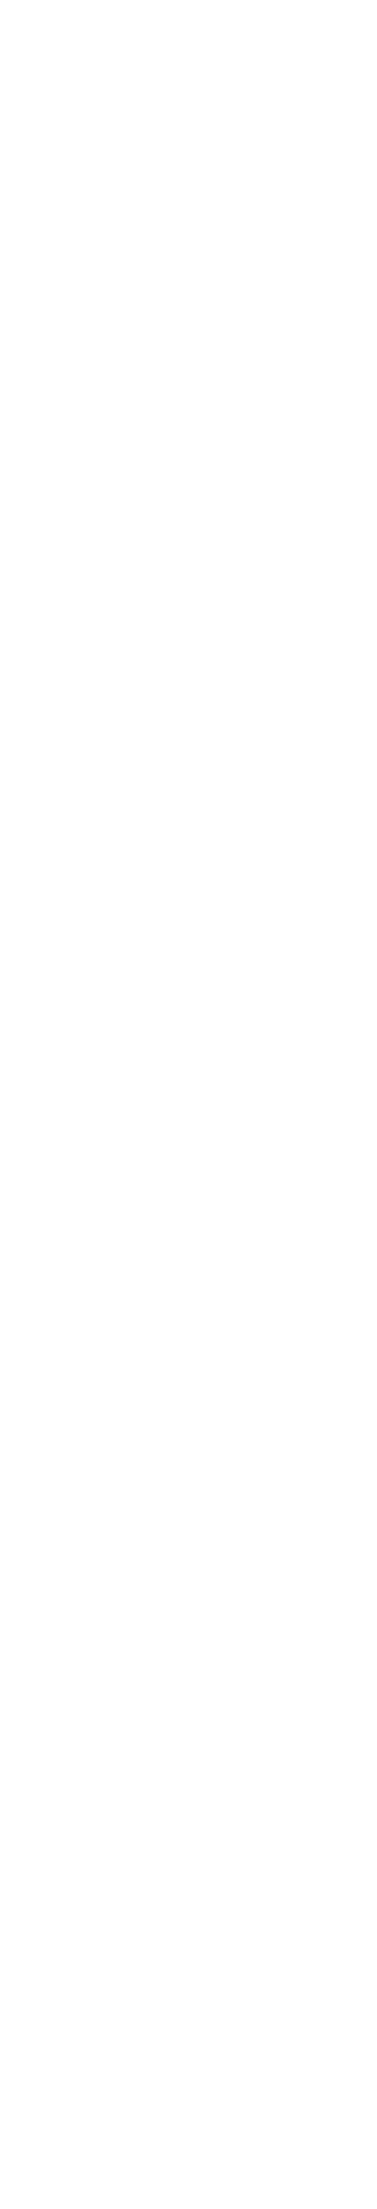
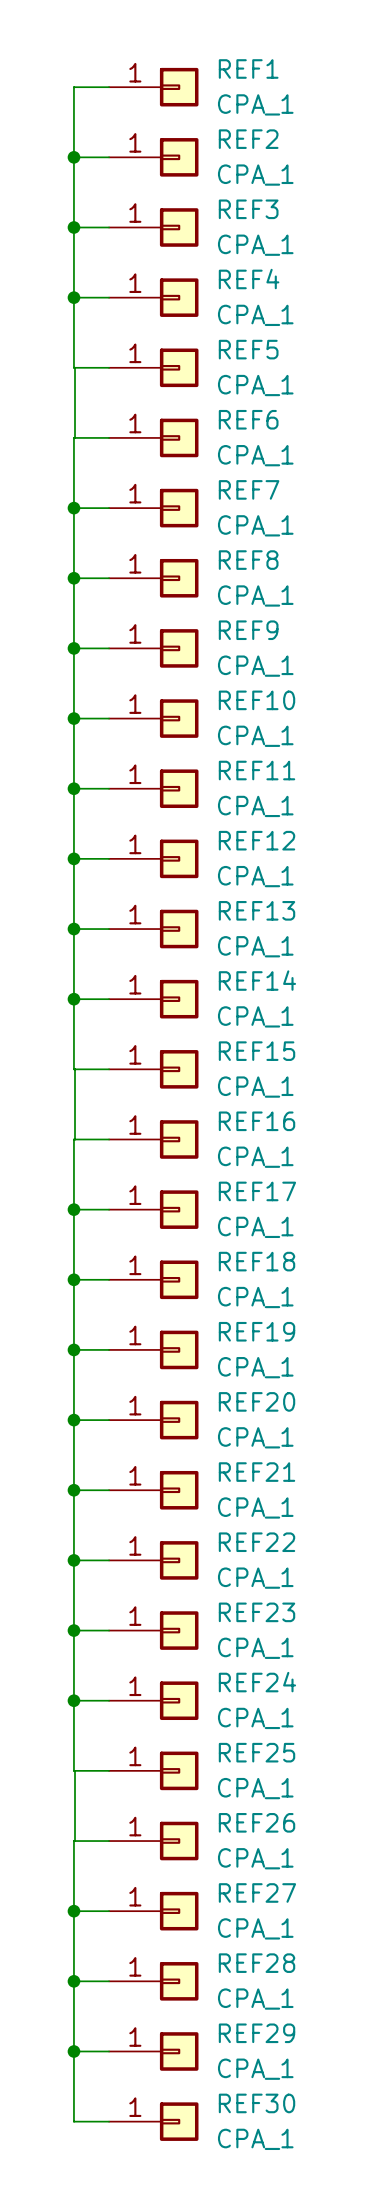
wire: none -> (109, 87) (73, 87) (73, 367) (109, 367)
REF1: none -> CPA_1 (153, 87)
wire: none -> (73, 157) (109, 157)
junction: none -> (73, 157)
REF2: none -> CPA_1 (153, 157)
wire: none -> (73, 227) (109, 227)
junction: none -> (73, 227)
REF3: none -> CPA_1 (153, 227)
wire: none -> (73, 297) (109, 297)
junction: none -> (73, 297)
REF4: none -> CPA_1 (153, 297)
wire: none -> (75, 367) (75, 437)
REF5: none -> CPA_1 (153, 367)
wire: none -> (109, 437) (73, 437) (73, 1069) (109, 1069)
REF6: none -> CPA_1 (153, 437)
wire: none -> (73, 508) (109, 508)
junction: none -> (73, 508)
REF7: none -> CPA_1 (153, 508)
wire: none -> (73, 578) (109, 578)
junction: none -> (73, 578)
REF8: none -> CPA_1 (153, 578)
wire: none -> (73, 648) (109, 648)
junction: none -> (73, 648)
REF9: none -> CPA_1 (153, 648)
wire: none -> (73, 718) (109, 718)
junction: none -> (73, 718)
REF10: none -> CPA_1 (153, 718)
wire: none -> (73, 788) (109, 788)
junction: none -> (73, 788)
REF11: none -> CPA_1 (153, 788)
wire: none -> (73, 858) (109, 858)
junction: none -> (73, 858)
REF12: none -> CPA_1 (153, 858)
wire: none -> (73, 929) (109, 929)
junction: none -> (73, 929)
REF13: none -> CPA_1 (153, 929)
wire: none -> (73, 999) (109, 999)
junction: none -> (73, 999)
REF14: none -> CPA_1 (153, 999)
wire: none -> (75, 1069) (75, 1139)
REF15: none -> CPA_1 (153, 1069)
wire: none -> (109, 1139) (73, 1139) (73, 1770) (109, 1770)
REF16: none -> CPA_1 (153, 1139)
wire: none -> (73, 1209) (109, 1209)
junction: none -> (73, 1209)
REF17: none -> CPA_1 (153, 1209)
wire: none -> (73, 1279) (109, 1279)
junction: none -> (73, 1279)
REF18: none -> CPA_1 (153, 1279)
wire: none -> (73, 1349) (109, 1349)
junction: none -> (73, 1349)
REF19: none -> CPA_1 (153, 1349)
wire: none -> (73, 1420) (109, 1420)
junction: none -> (73, 1420)
REF20: none -> CPA_1 (153, 1420)
wire: none -> (73, 1490) (109, 1490)
junction: none -> (73, 1490)
REF21: none -> CPA_1 (153, 1490)
wire: none -> (73, 1560) (109, 1560)
junction: none -> (73, 1560)
REF22: none -> CPA_1 (153, 1560)
wire: none -> (73, 1630) (109, 1630)
junction: none -> (73, 1630)
REF23: none -> CPA_1 (153, 1630)
wire: none -> (73, 1700) (109, 1700)
junction: none -> (73, 1700)
REF24: none -> CPA_1 (153, 1700)
wire: none -> (75, 1770) (75, 1841)
REF25: none -> CPA_1 (153, 1770)
wire: none -> (109, 1841) (73, 1841) (73, 2121) (109, 2121)
REF26: none -> CPA_1 (153, 1841)
wire: none -> (73, 1911) (109, 1911)
junction: none -> (73, 1911)
REF27: none -> CPA_1 (153, 1911)
wire: none -> (73, 1981) (109, 1981)
junction: none -> (73, 1981)
REF28: none -> CPA_1 (153, 1981)
wire: none -> (73, 2051) (109, 2051)
junction: none -> (73, 2051)
REF29: none -> CPA_1 (153, 2051)
REF30: none -> CPA_1 (153, 2121)

